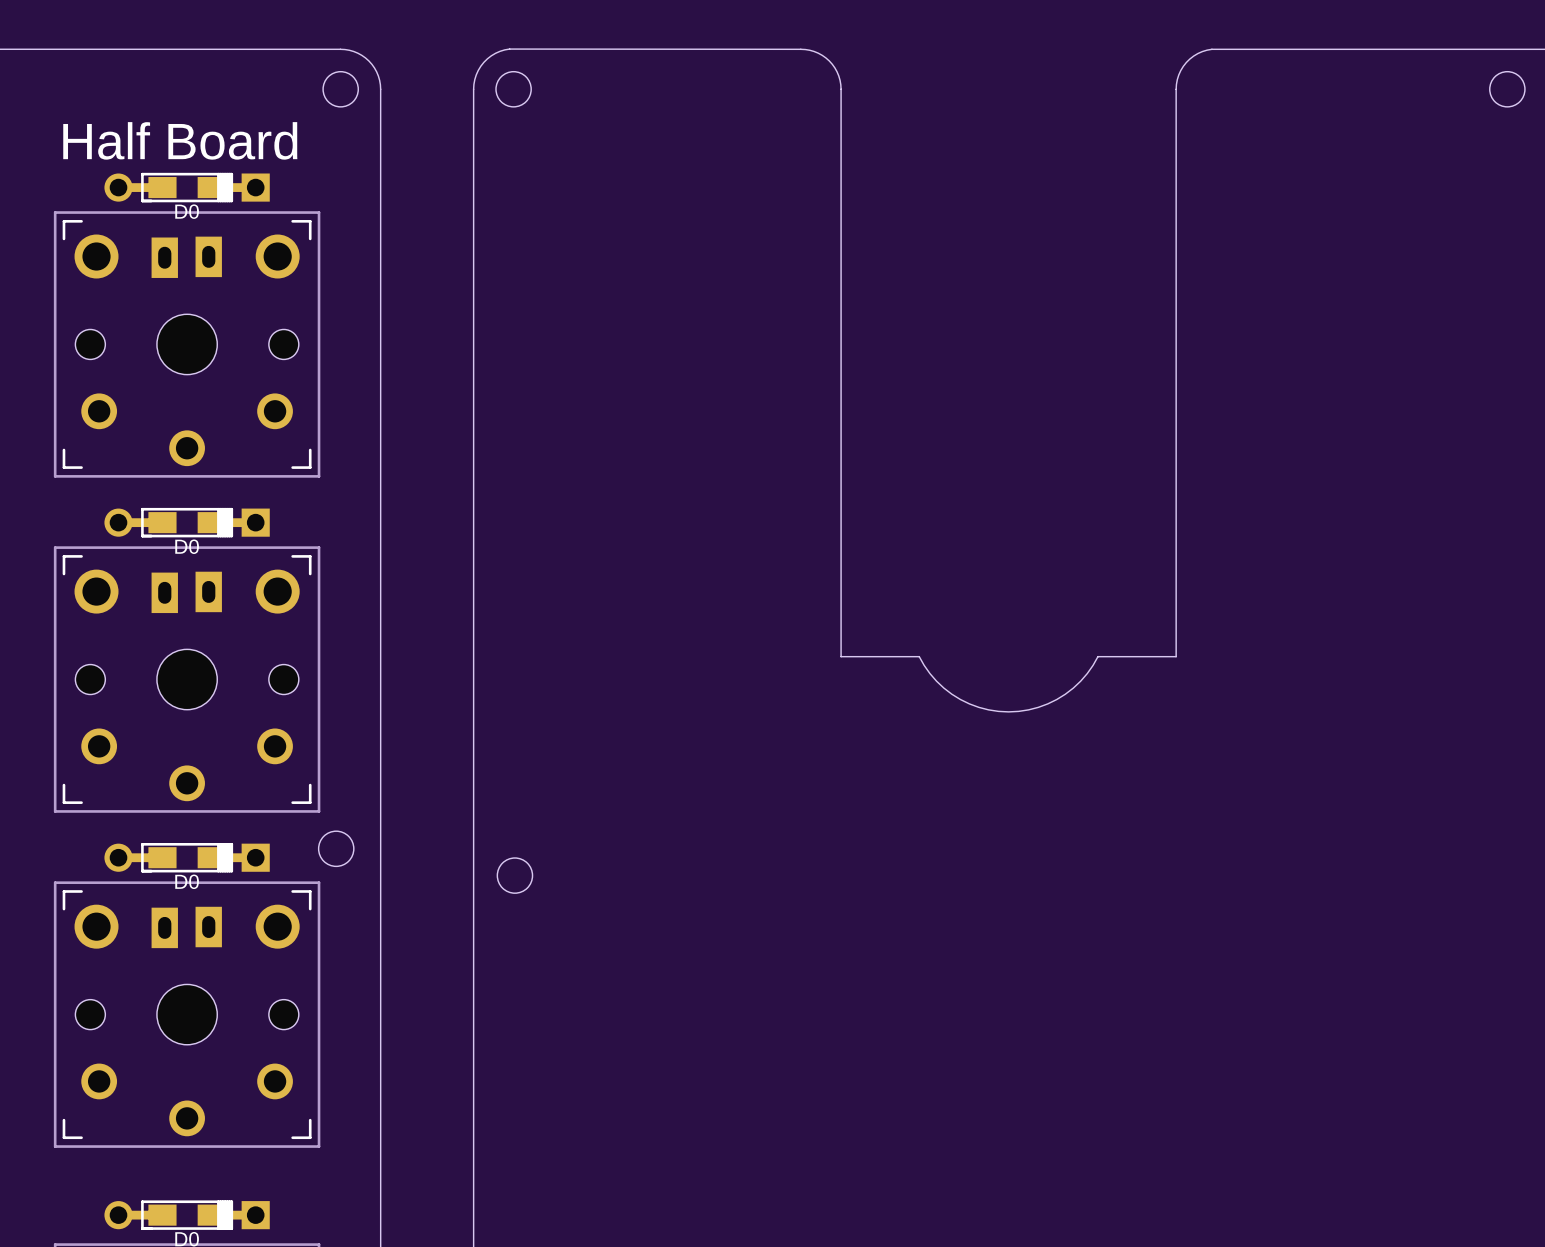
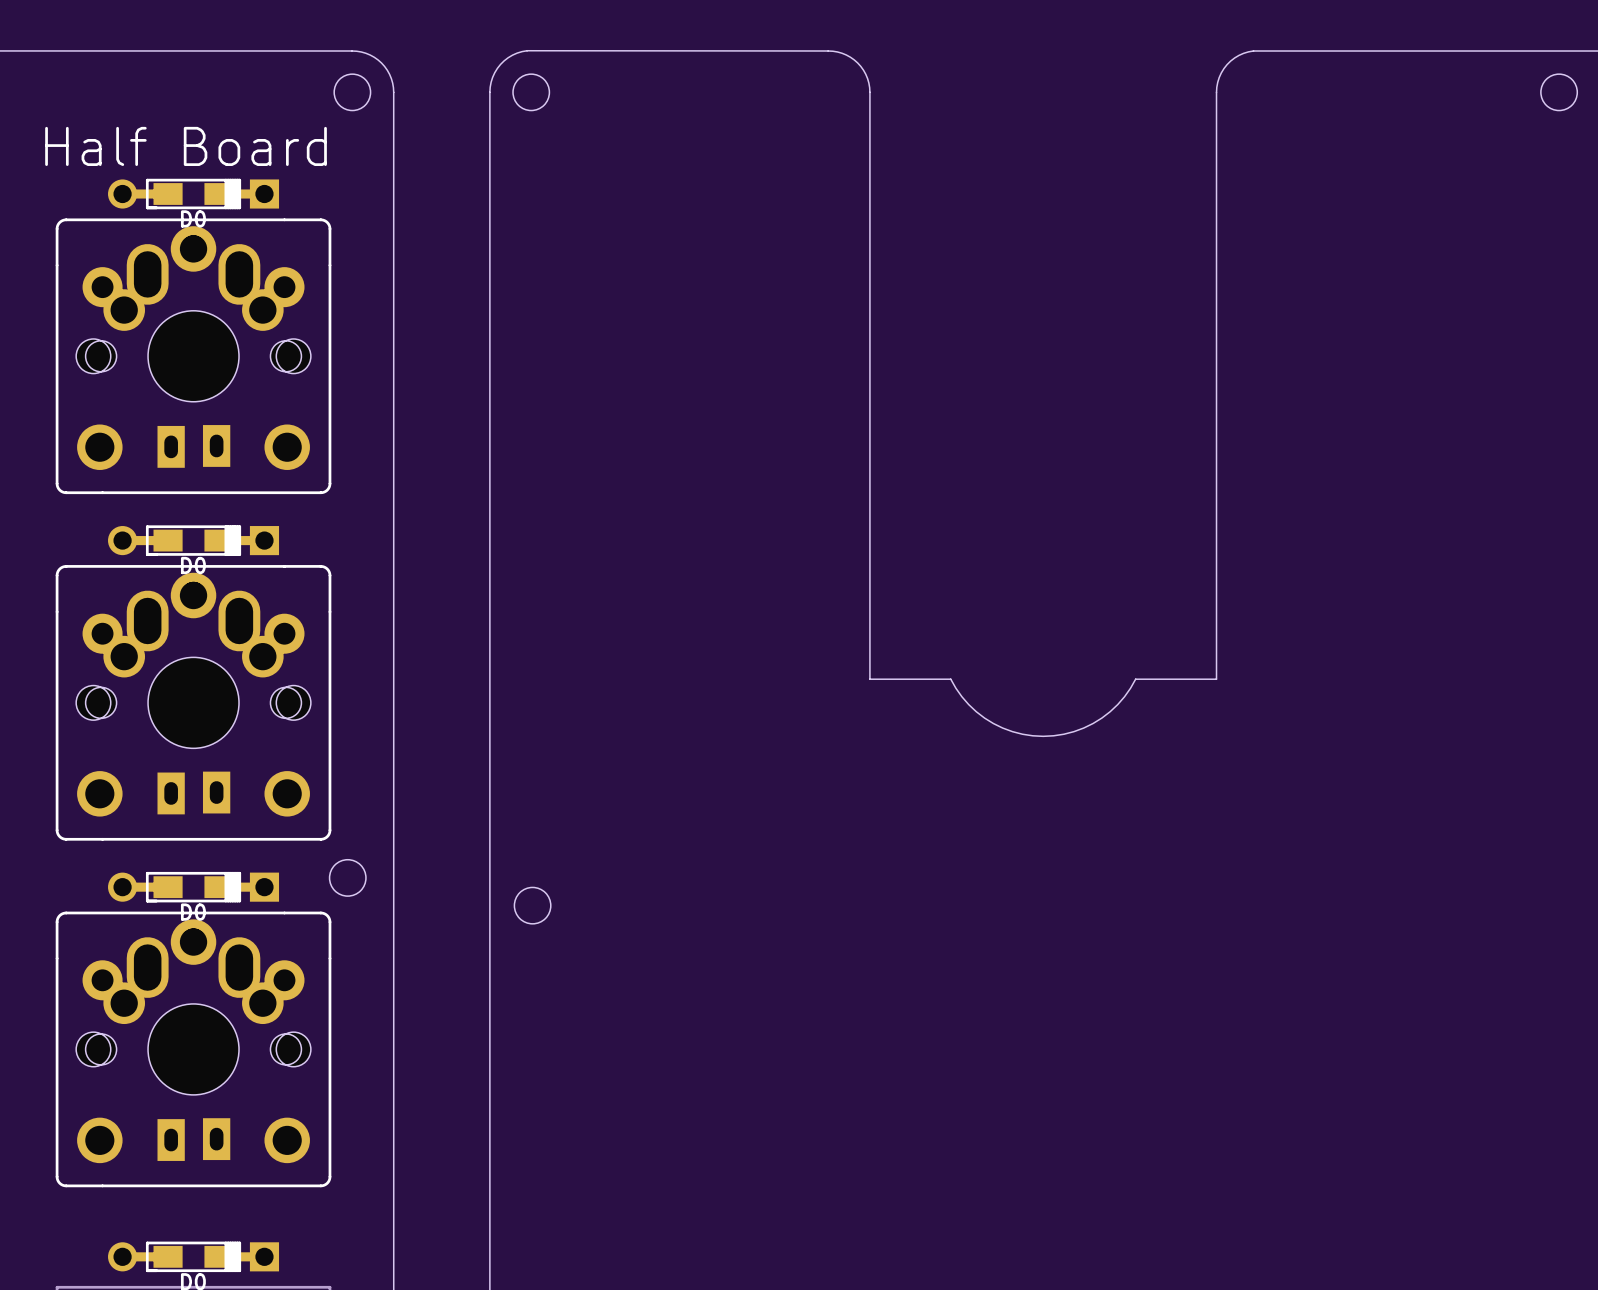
part footprint: [53, 211, 321, 478] -> [55, 218, 332, 495]
part footprint: [53, 546, 321, 813] -> [55, 565, 332, 841]
part footprint: [53, 881, 321, 1148] -> [55, 911, 332, 1188]

